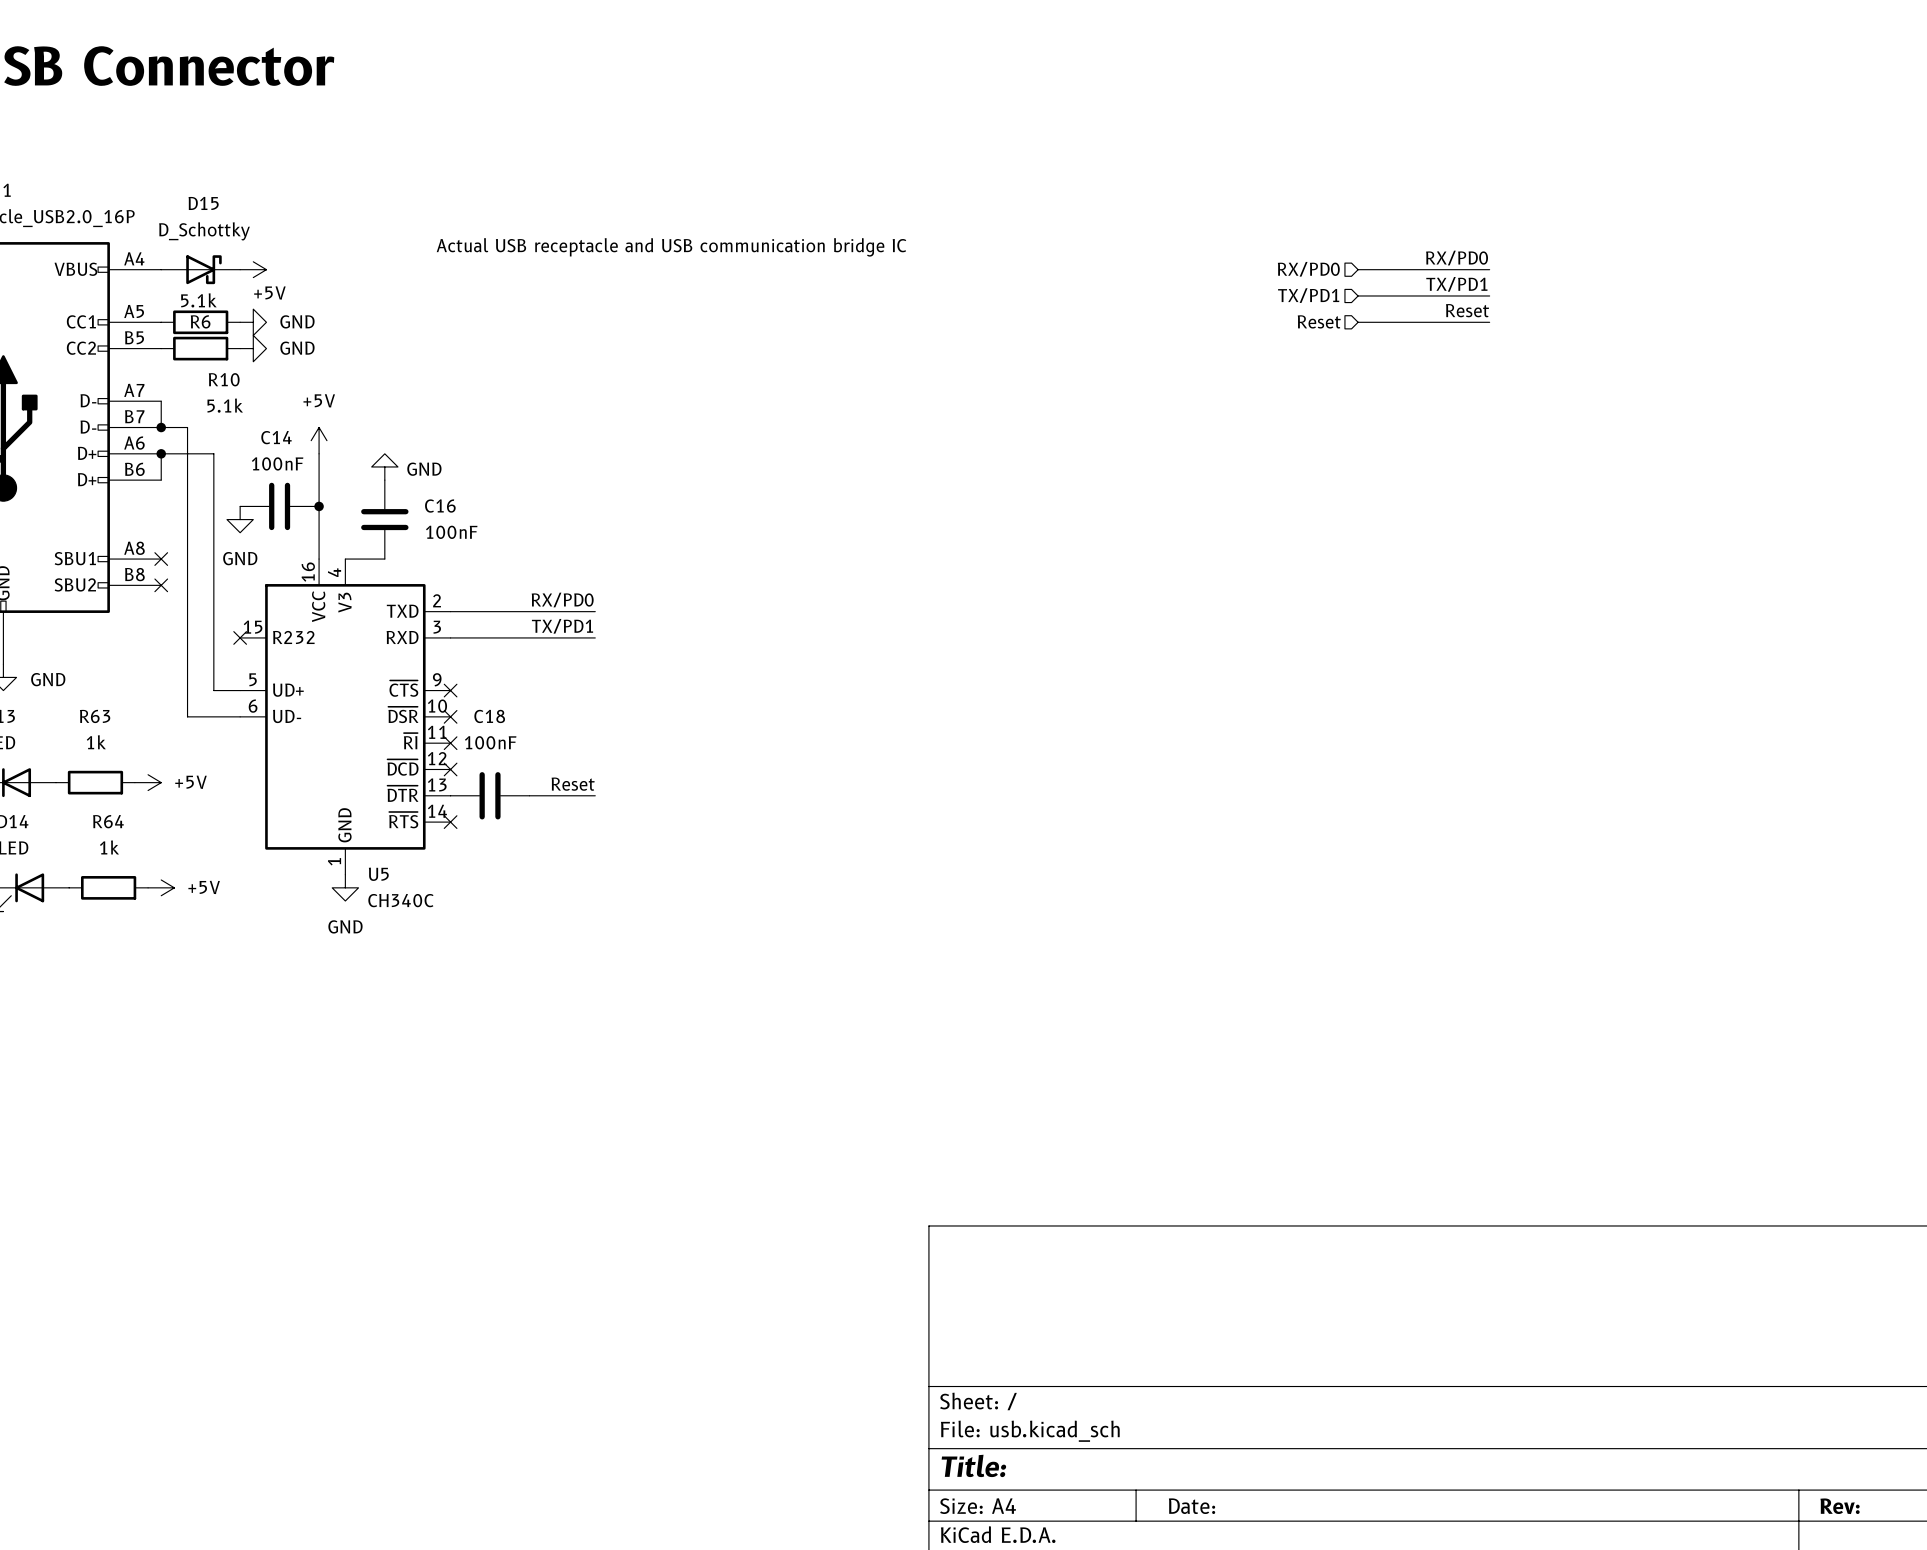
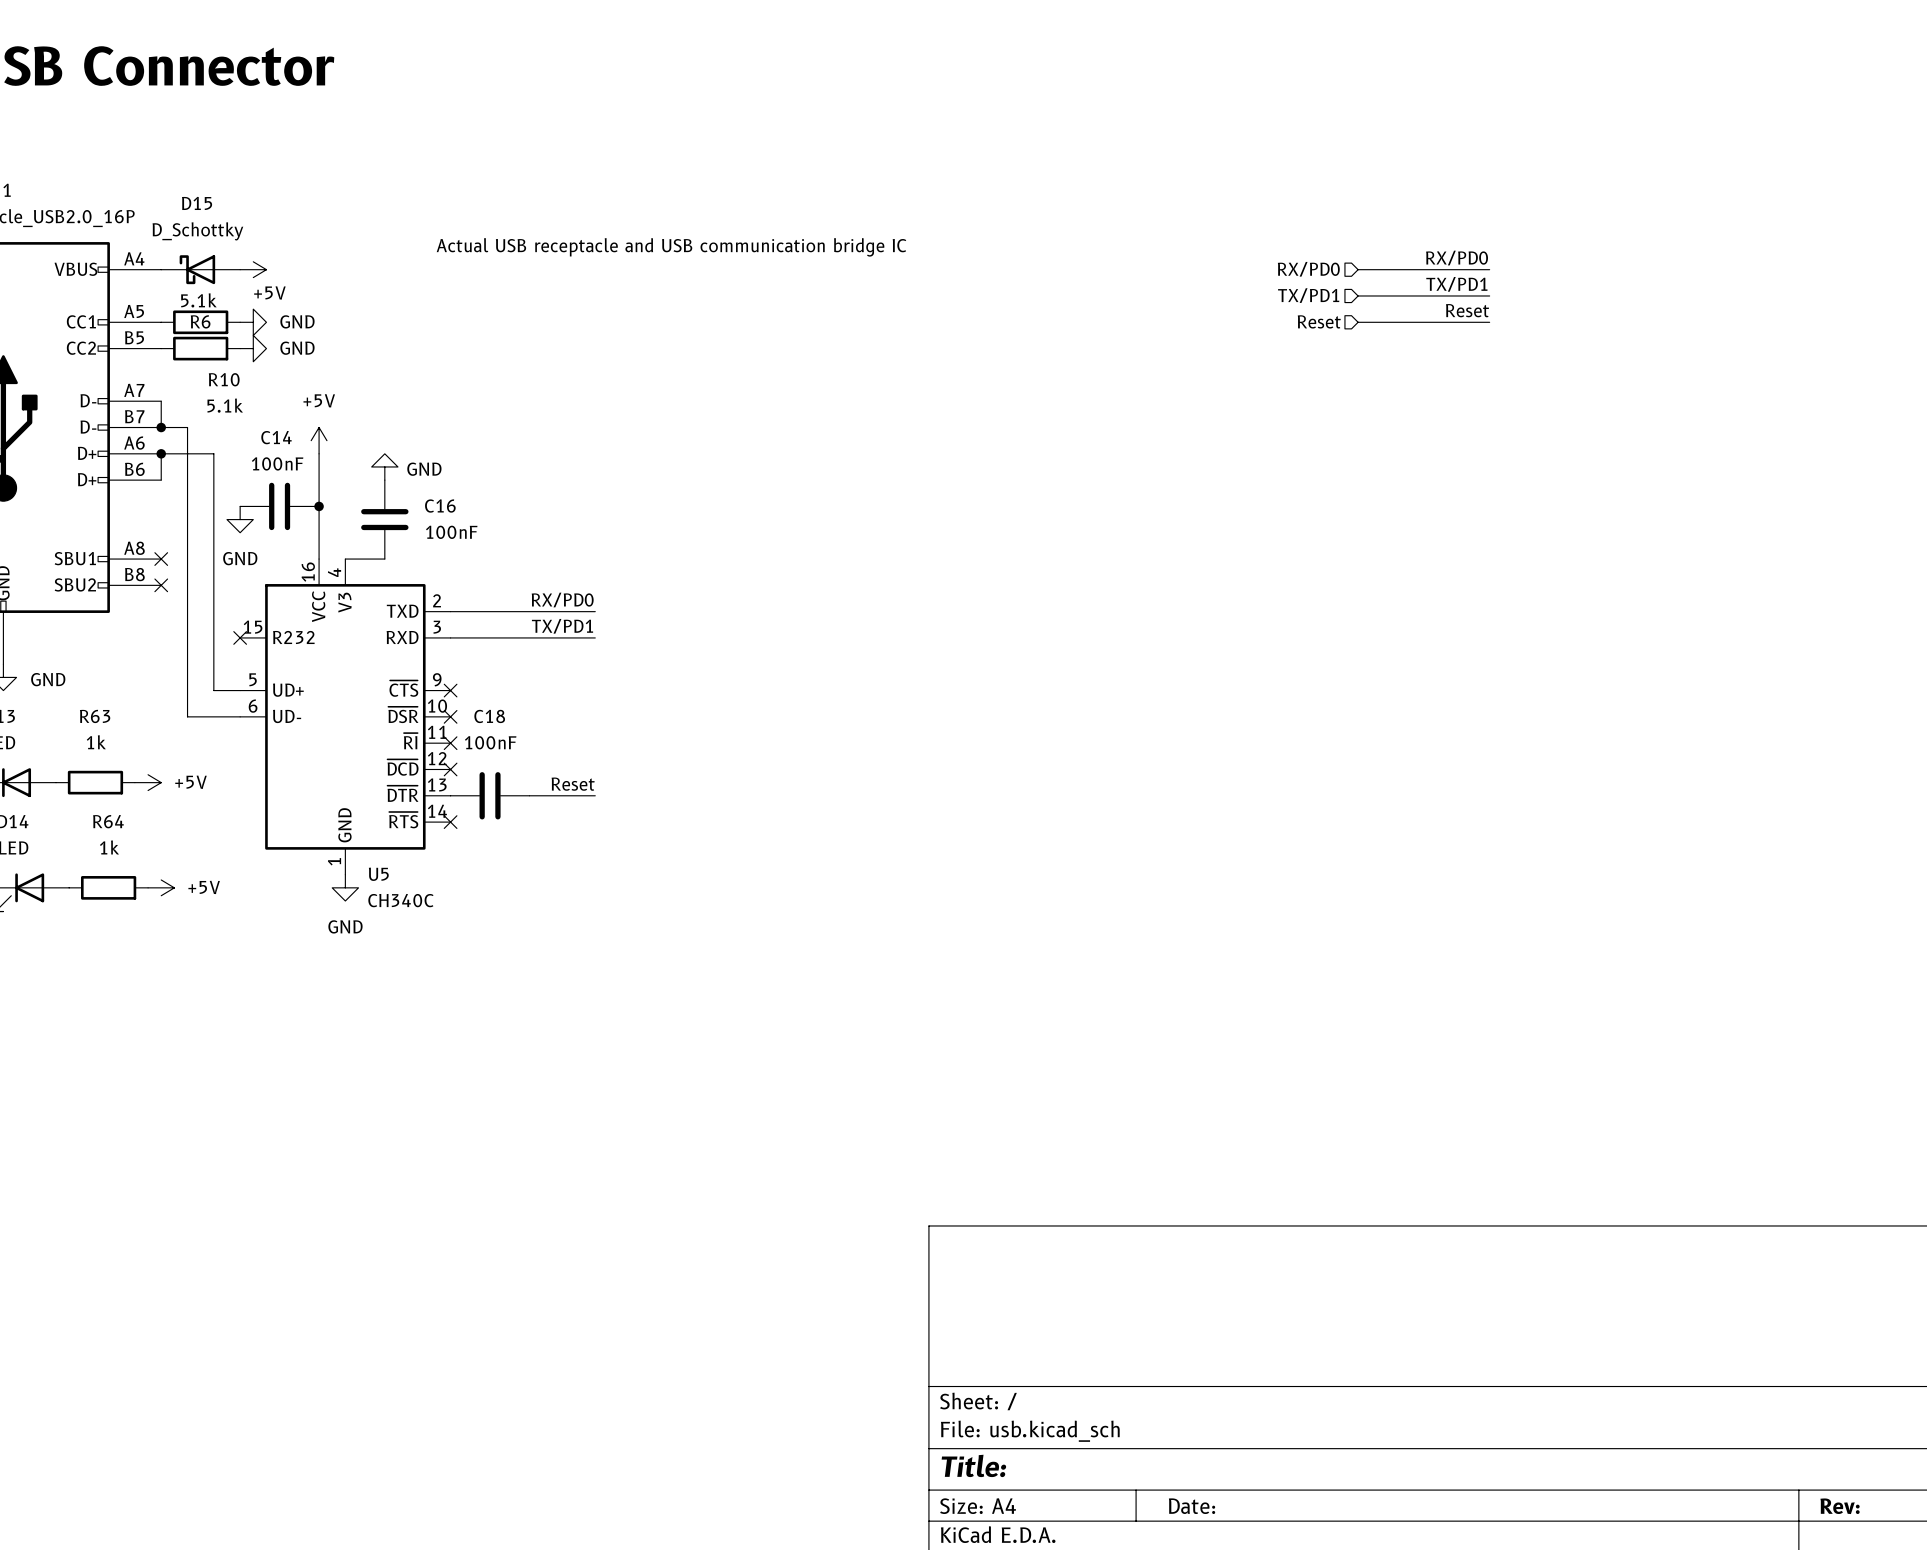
D15 flip: as is (203, 269) -> left-right (197, 269)

